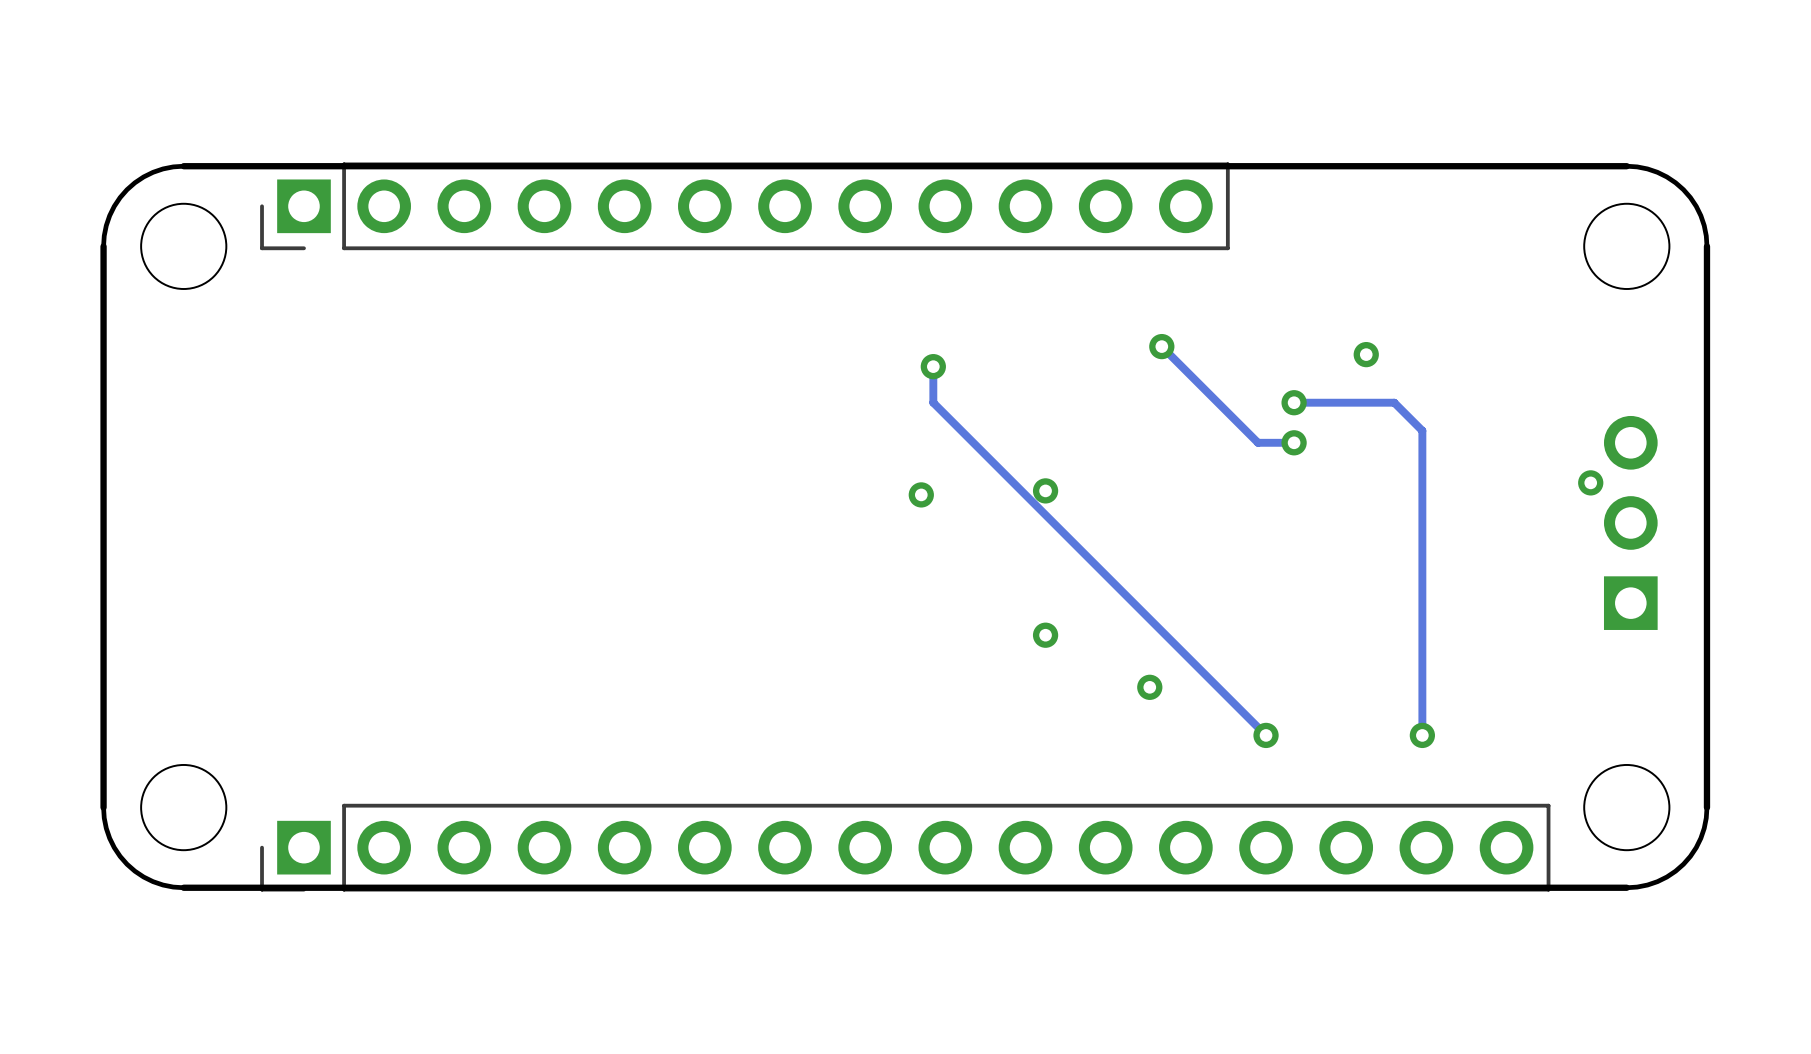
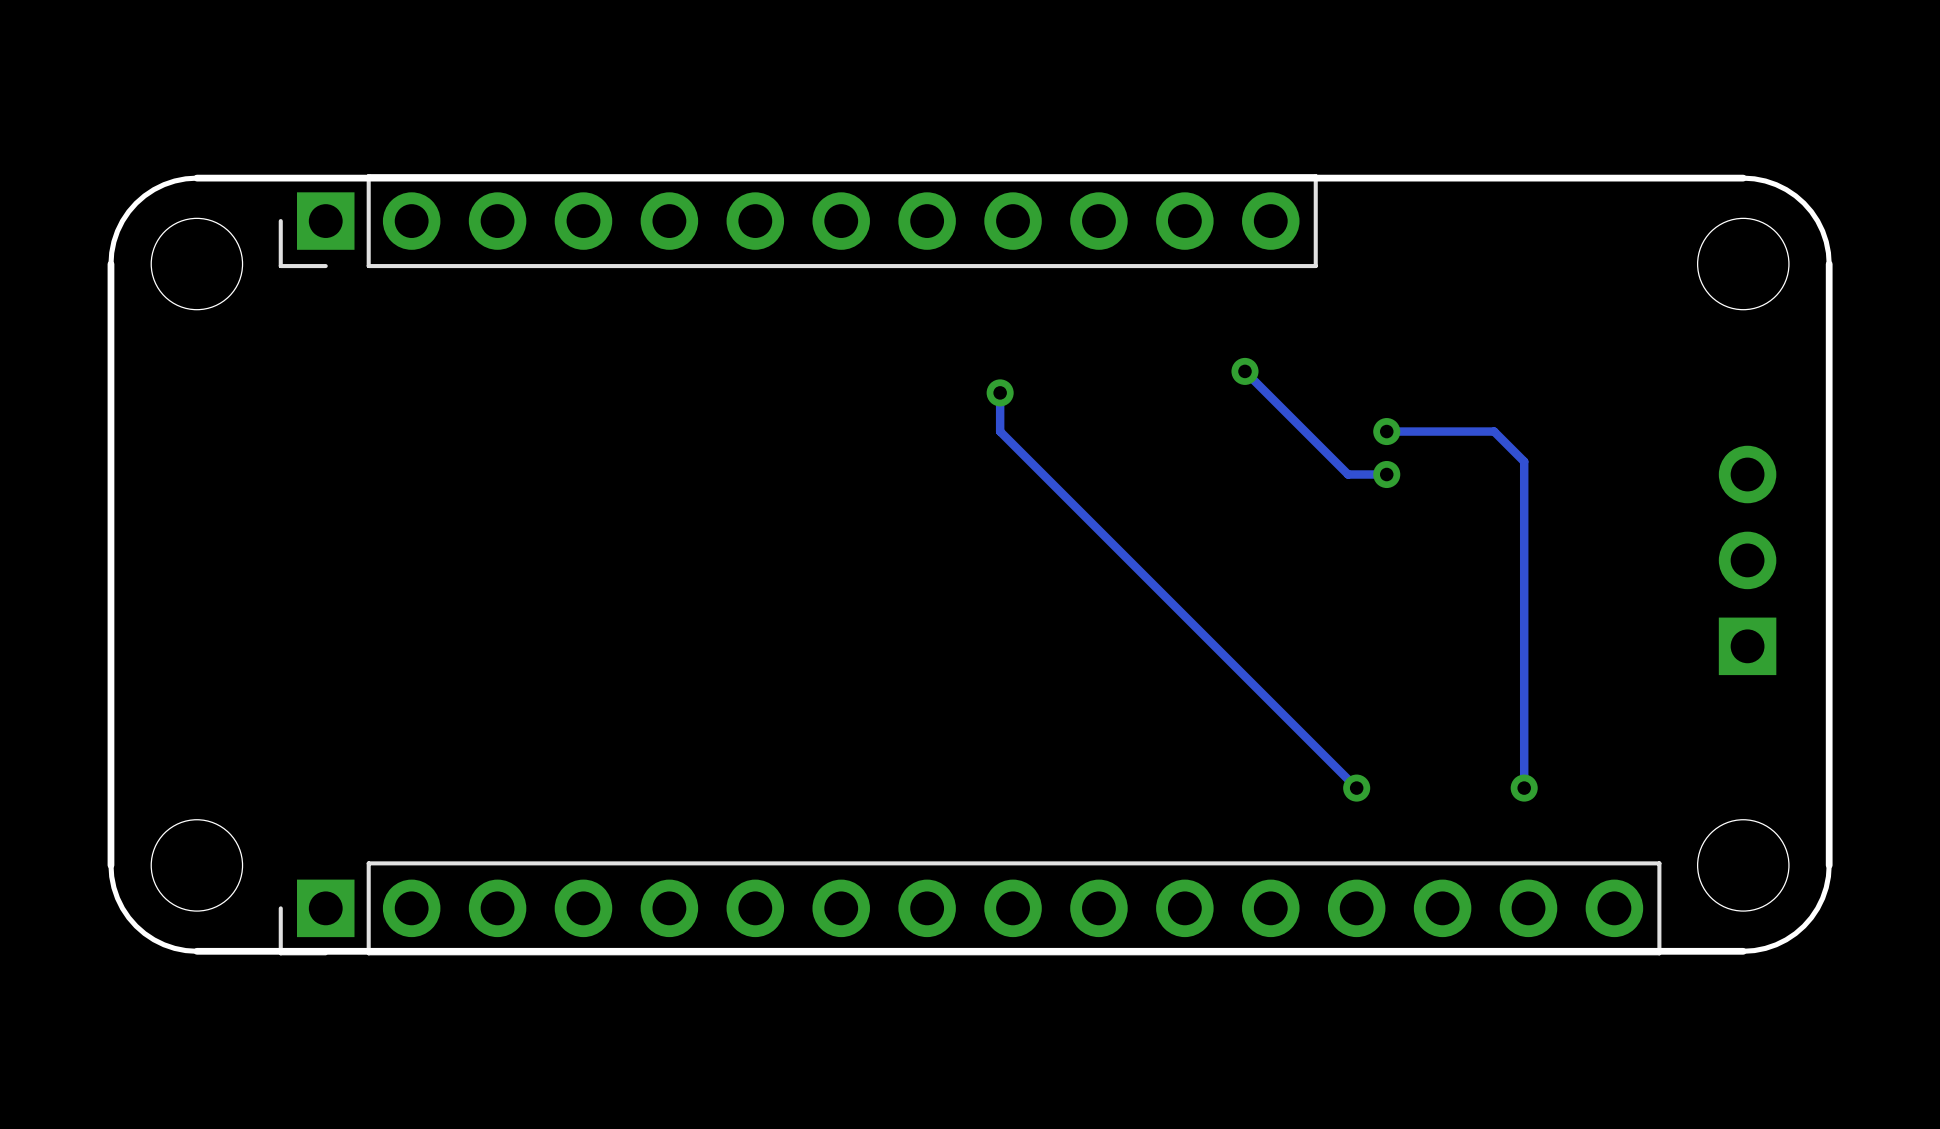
via: (1366, 354) -> none
via: (1590, 482) -> none
via: (1045, 490) -> none
via: (921, 494) -> none
via: (1045, 635) -> none
via: (1149, 687) -> none

